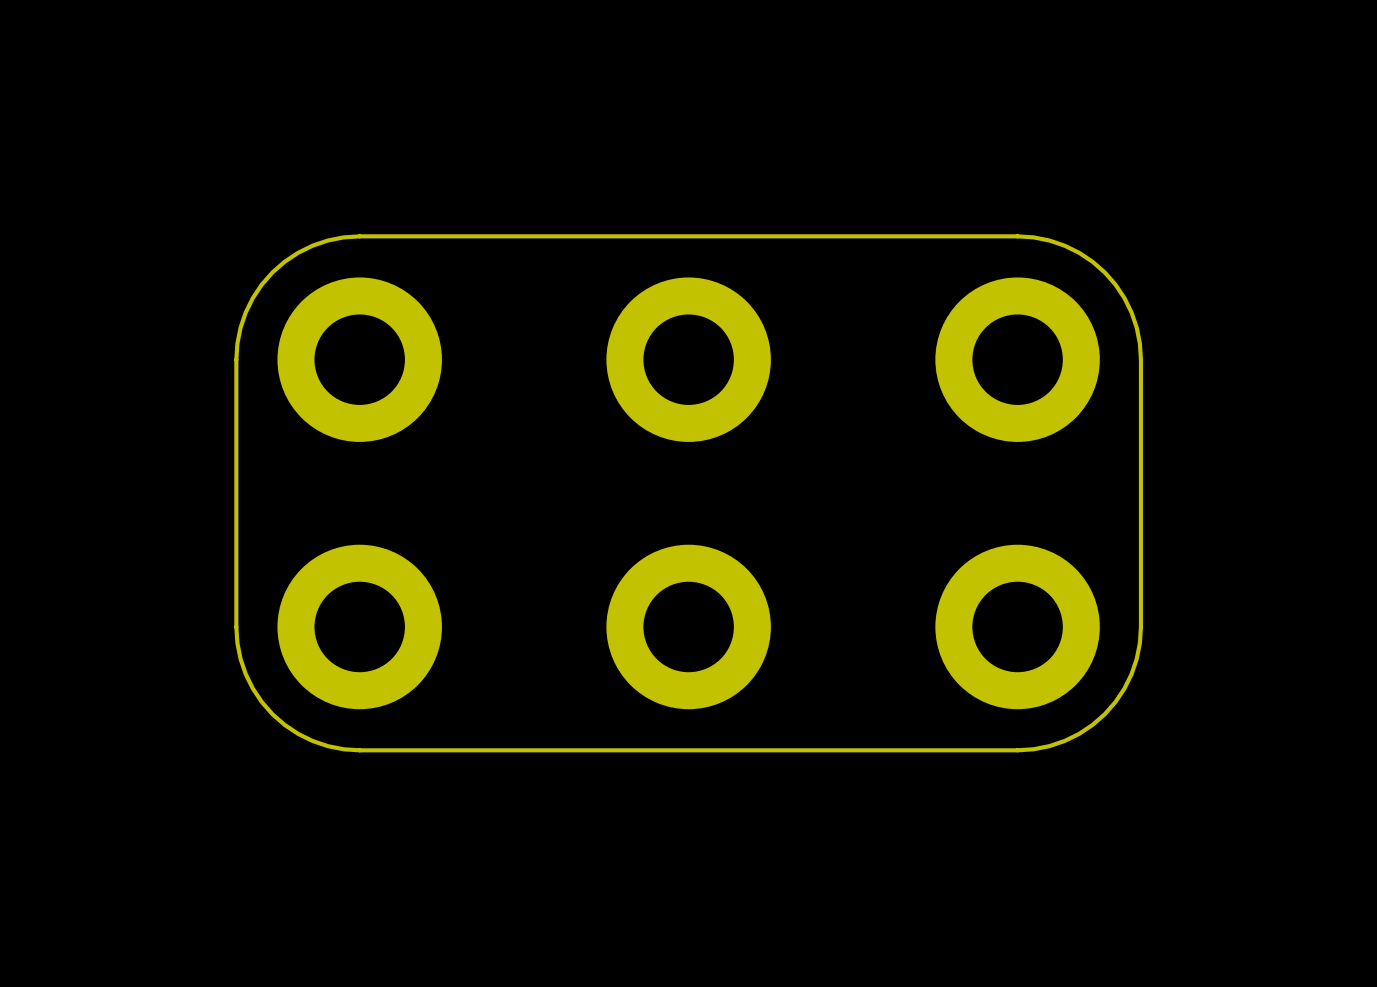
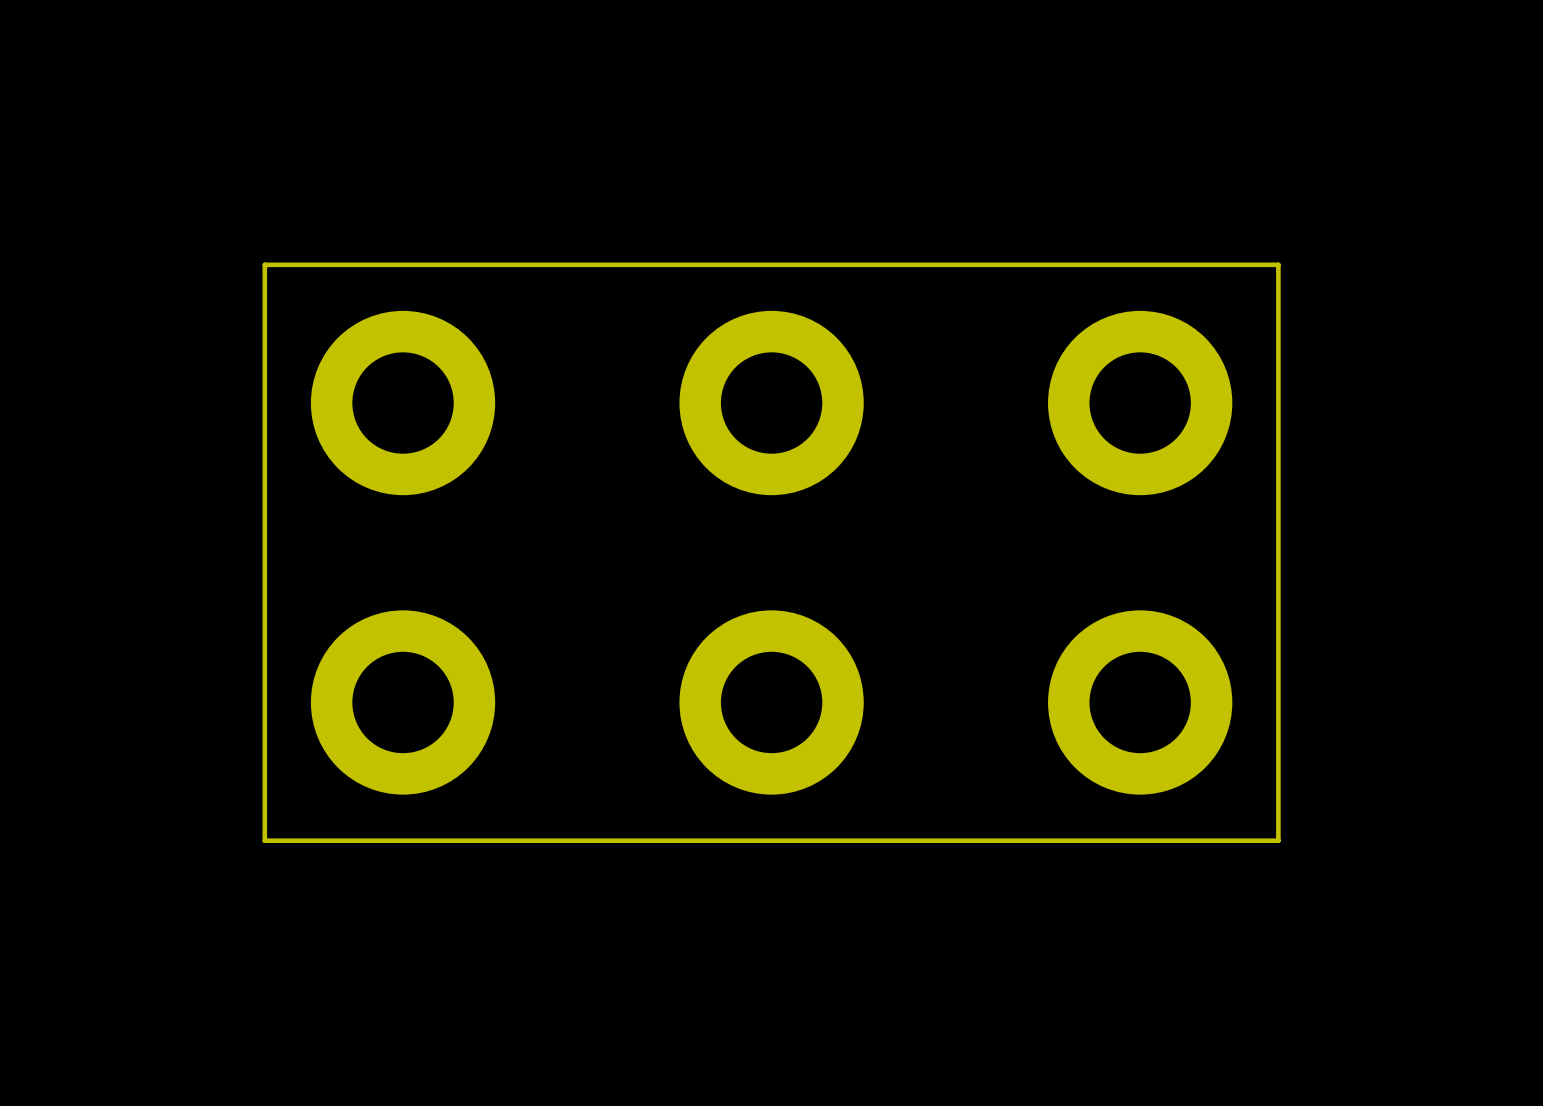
board edge: (359, 236) (327, 240) (312, 245) (298, 252) (272, 272) (252, 298) (245, 312) (237, 343) (236, 359) -> (403, 264) (264, 264) (264, 403)
board edge: (1017, 236) (1049, 240) (1064, 245) (1079, 252) (1104, 272) (1124, 298) (1131, 312) (1139, 343) (1140, 359) -> (1140, 264) (1278, 264) (1278, 403)
board edge: (236, 626) (237, 643) (245, 674) (252, 688) (272, 714) (298, 733) (312, 740) (327, 746) (359, 750) -> (264, 702) (264, 840) (403, 840)
board edge: (1140, 626) (1139, 643) (1131, 674) (1124, 688) (1104, 714) (1079, 733) (1064, 740) (1049, 746) (1017, 750) -> (1278, 702) (1278, 840) (1140, 840)

